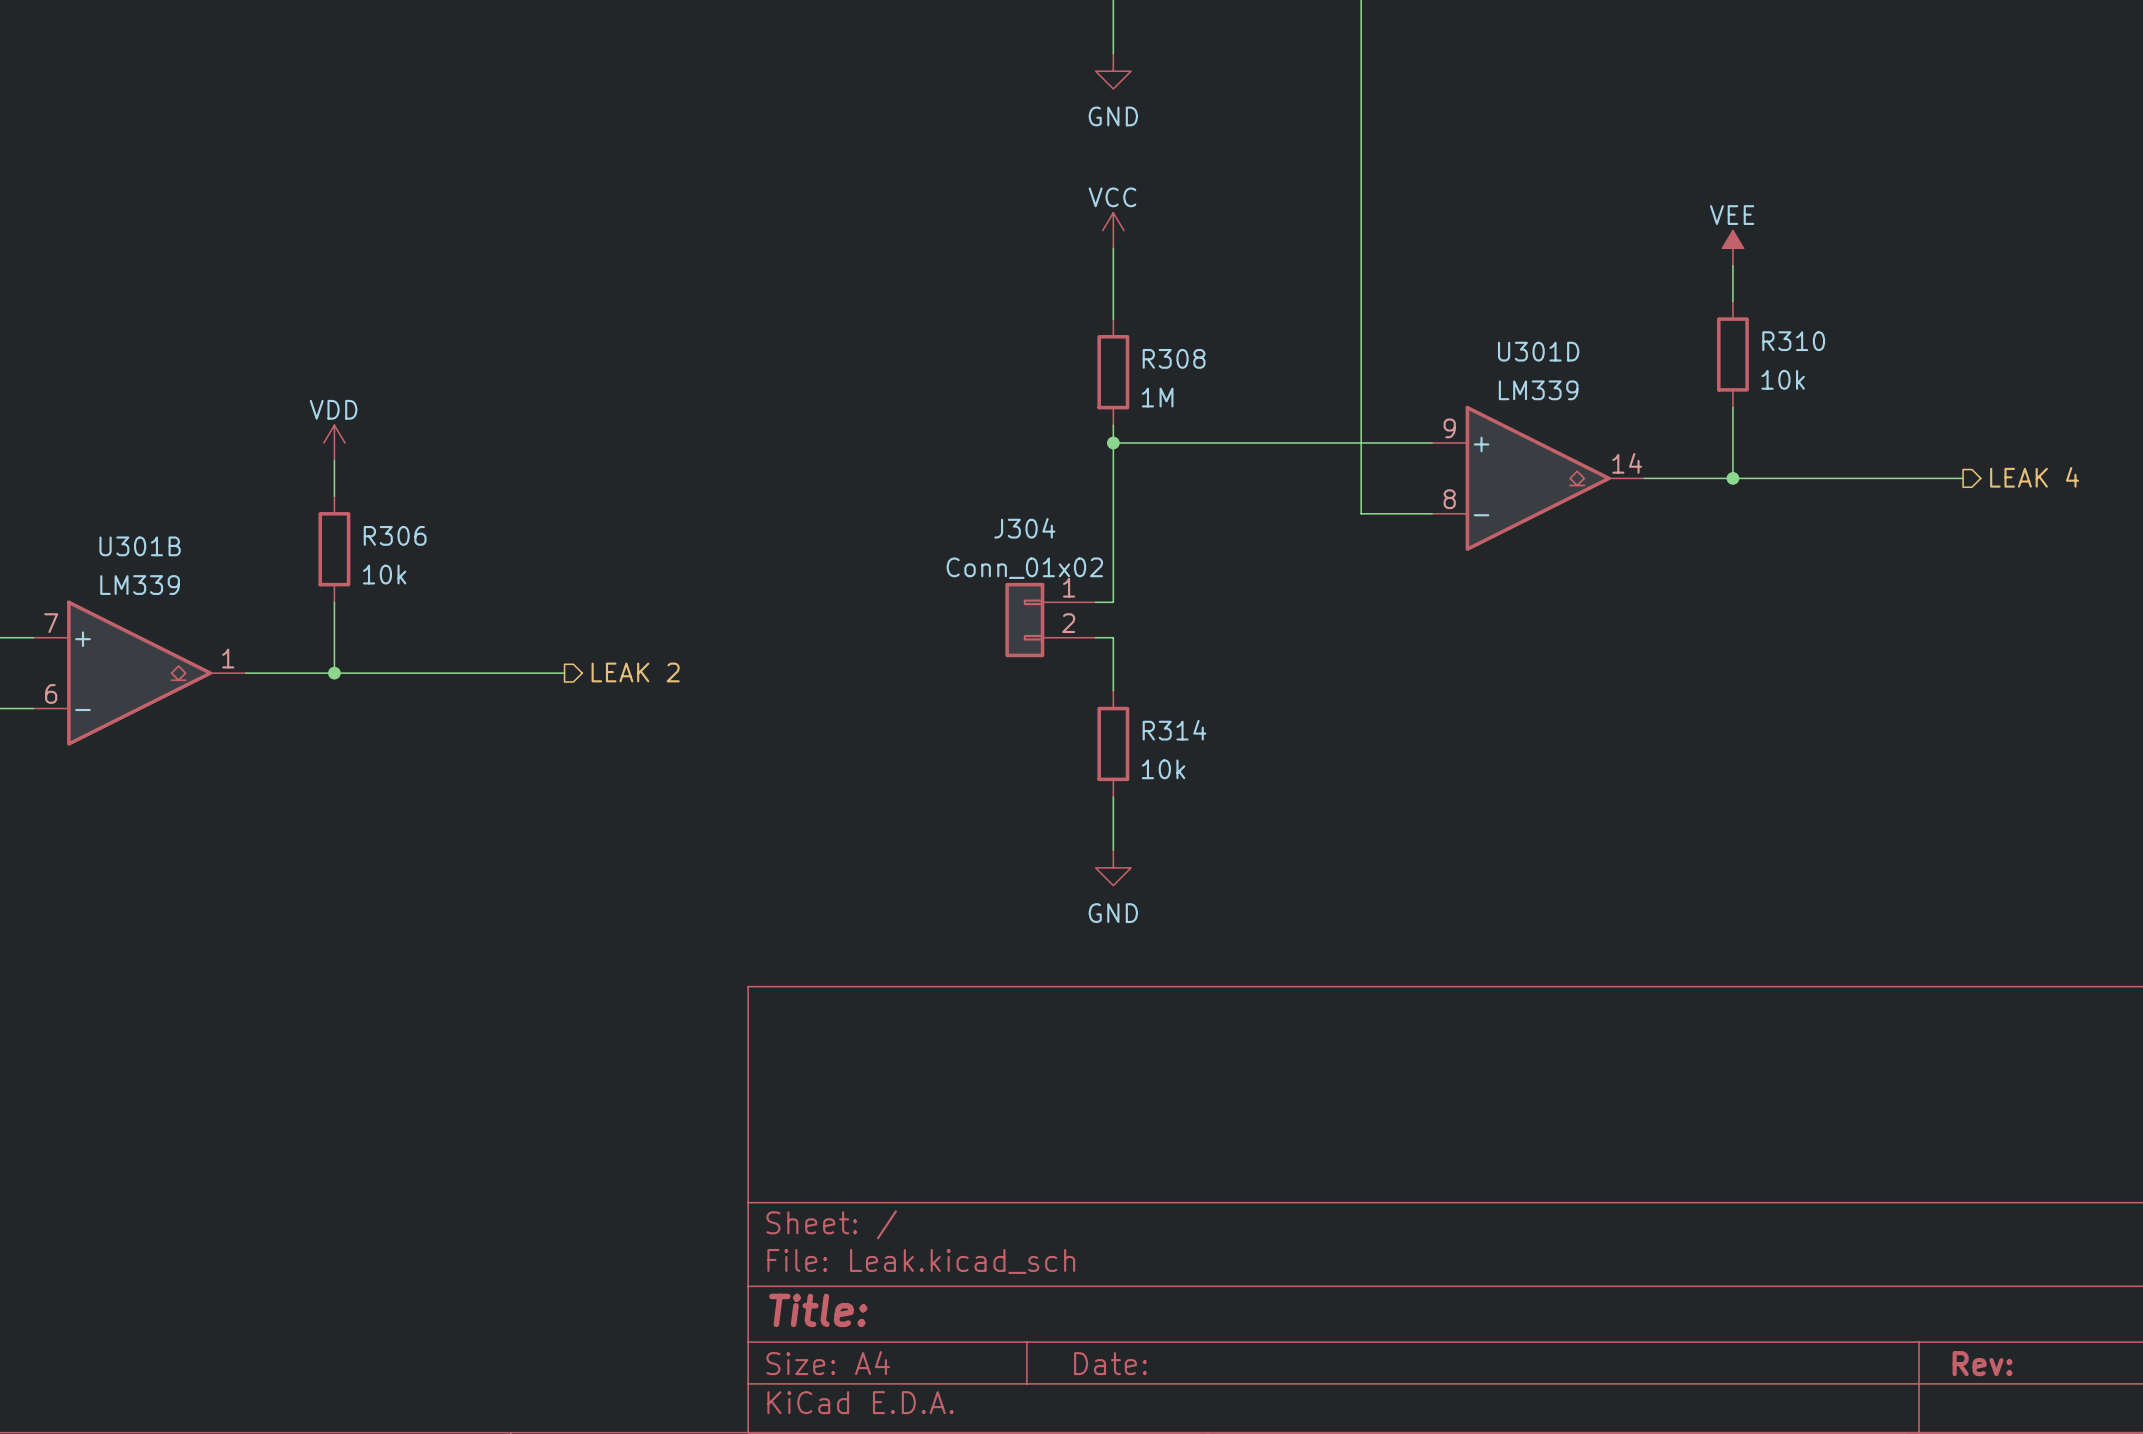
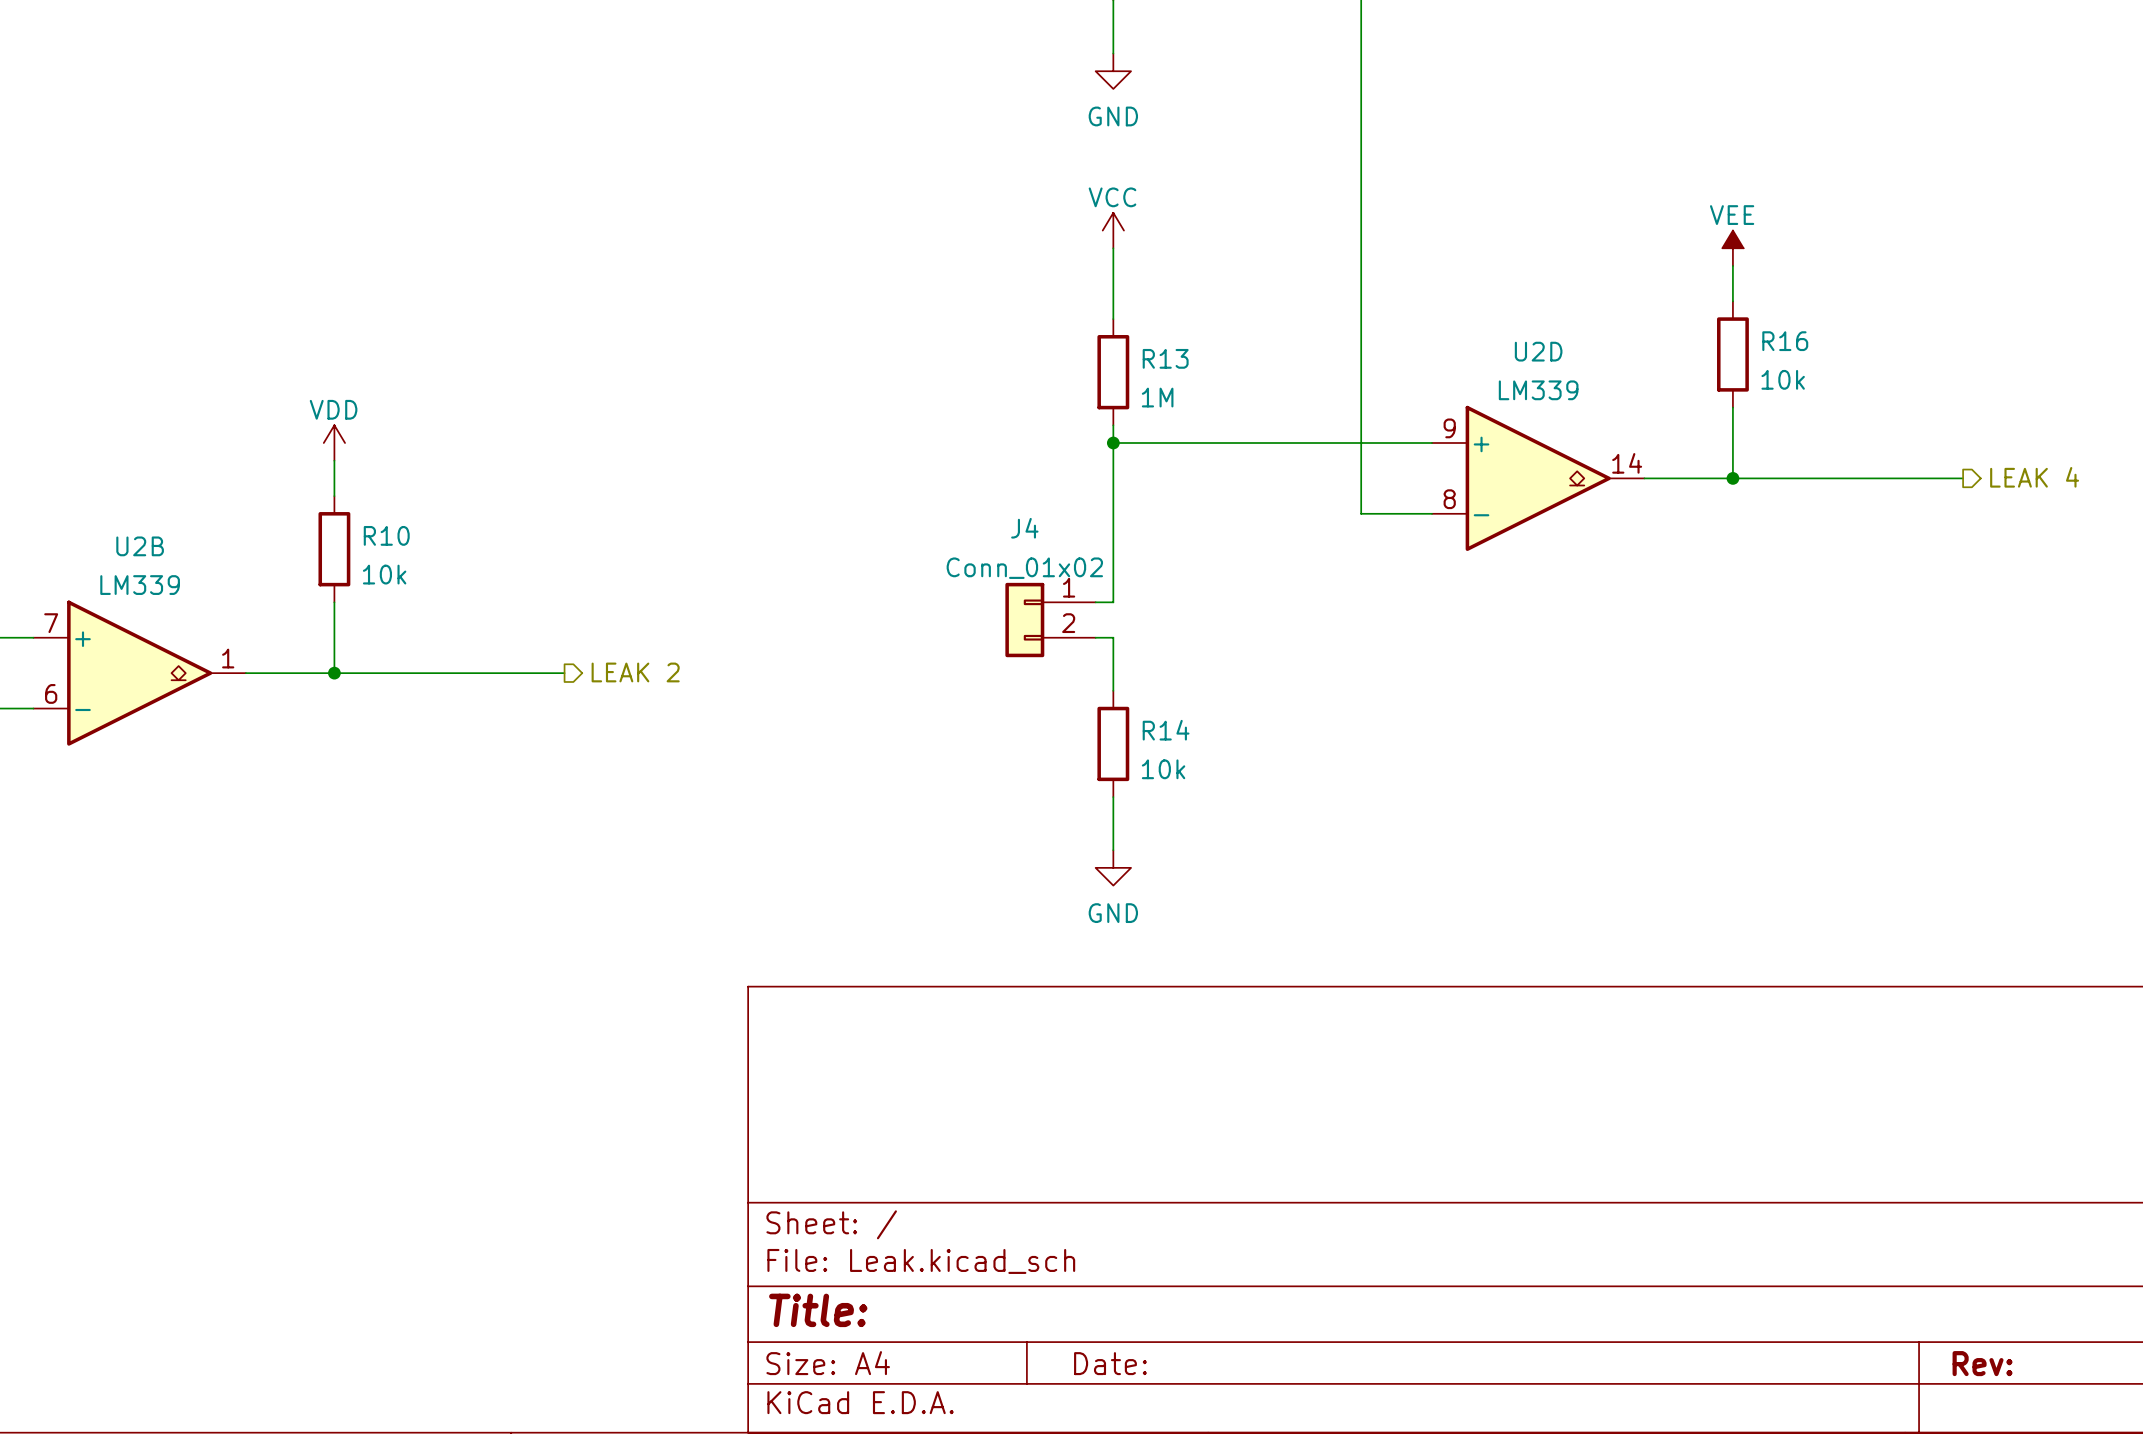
R310 name: R310 (1793, 341) -> R16 (1785, 341)
U301D name: U301D (1538, 351) -> U2D (1538, 351)
R308 name: R308 (1174, 358) -> R13 (1165, 358)
J304 name: J304 (1024, 528) -> J4 (1024, 528)
R306 name: R306 (395, 535) -> R10 (386, 535)
U301B name: U301B (140, 546) -> U2B (140, 546)
R314 name: R314 (1174, 730) -> R14 (1166, 730)

